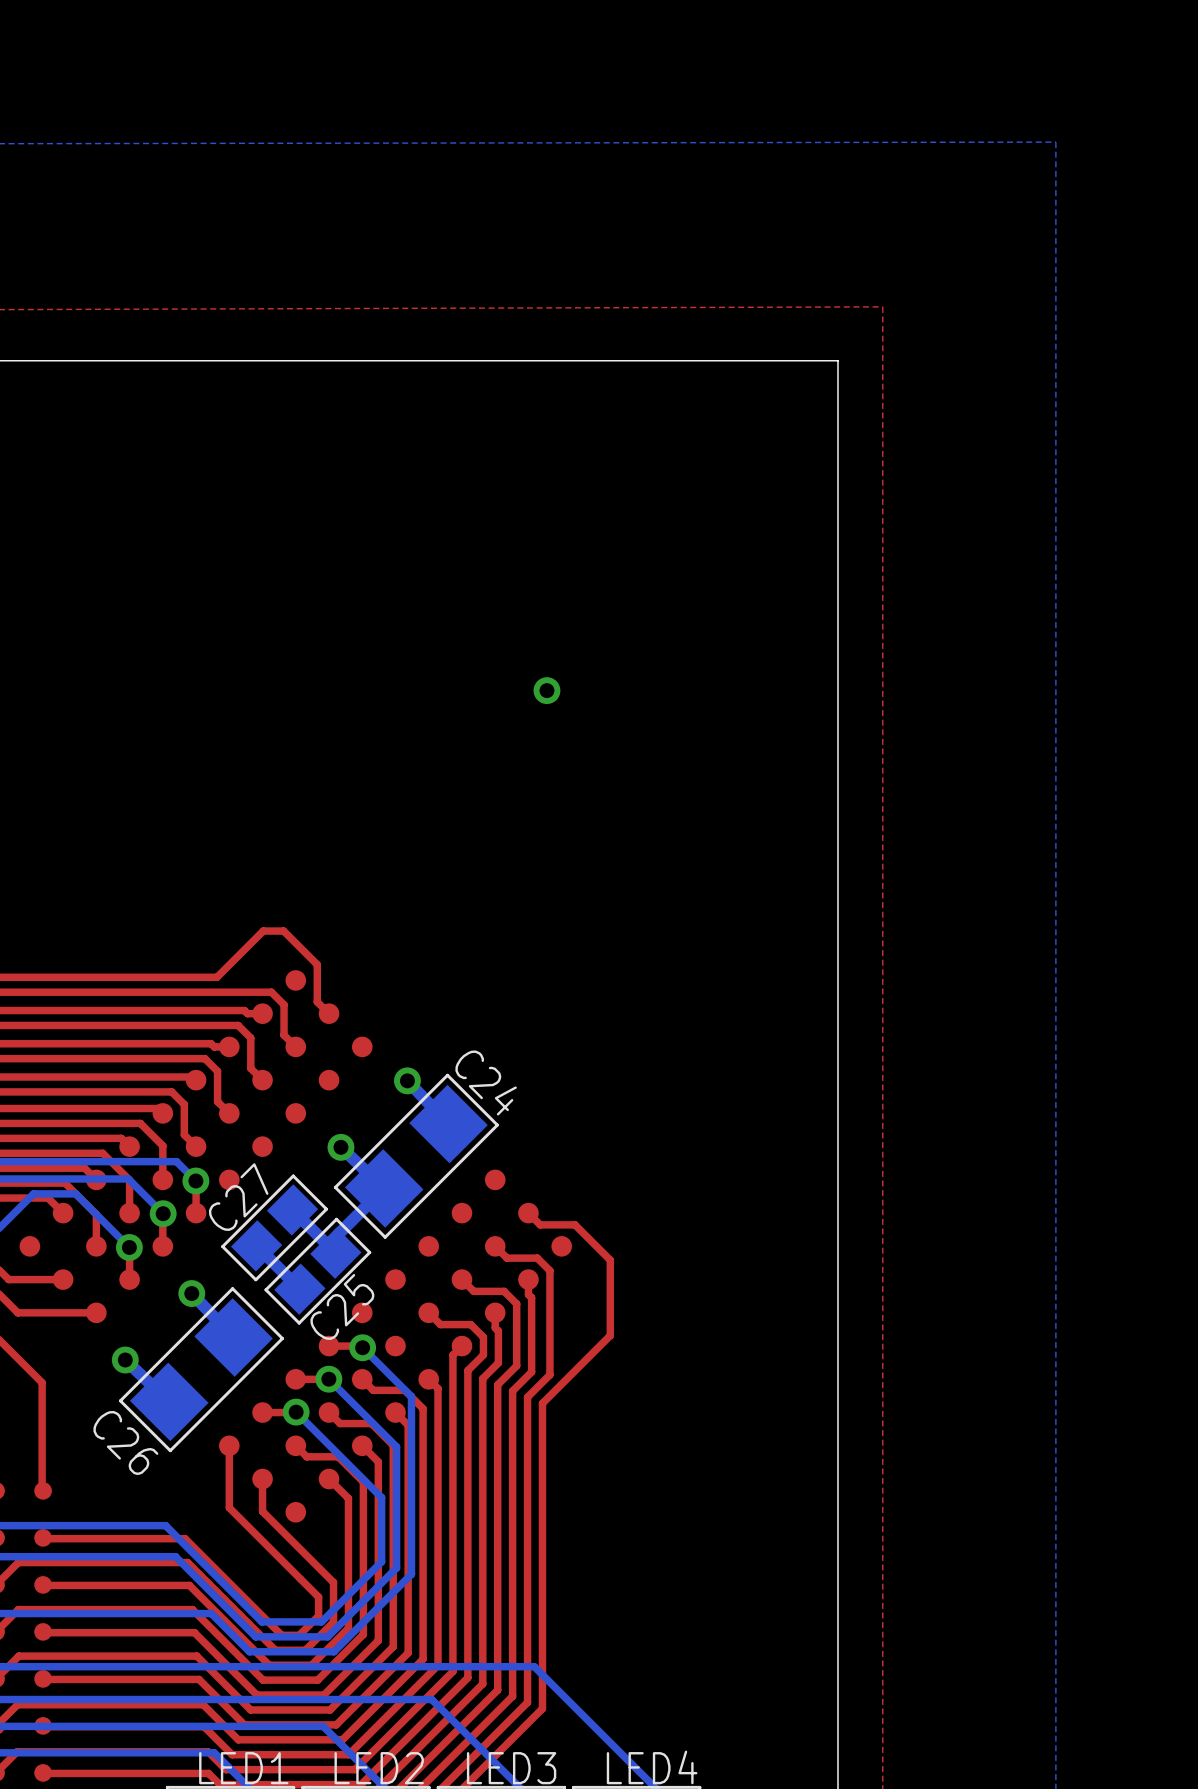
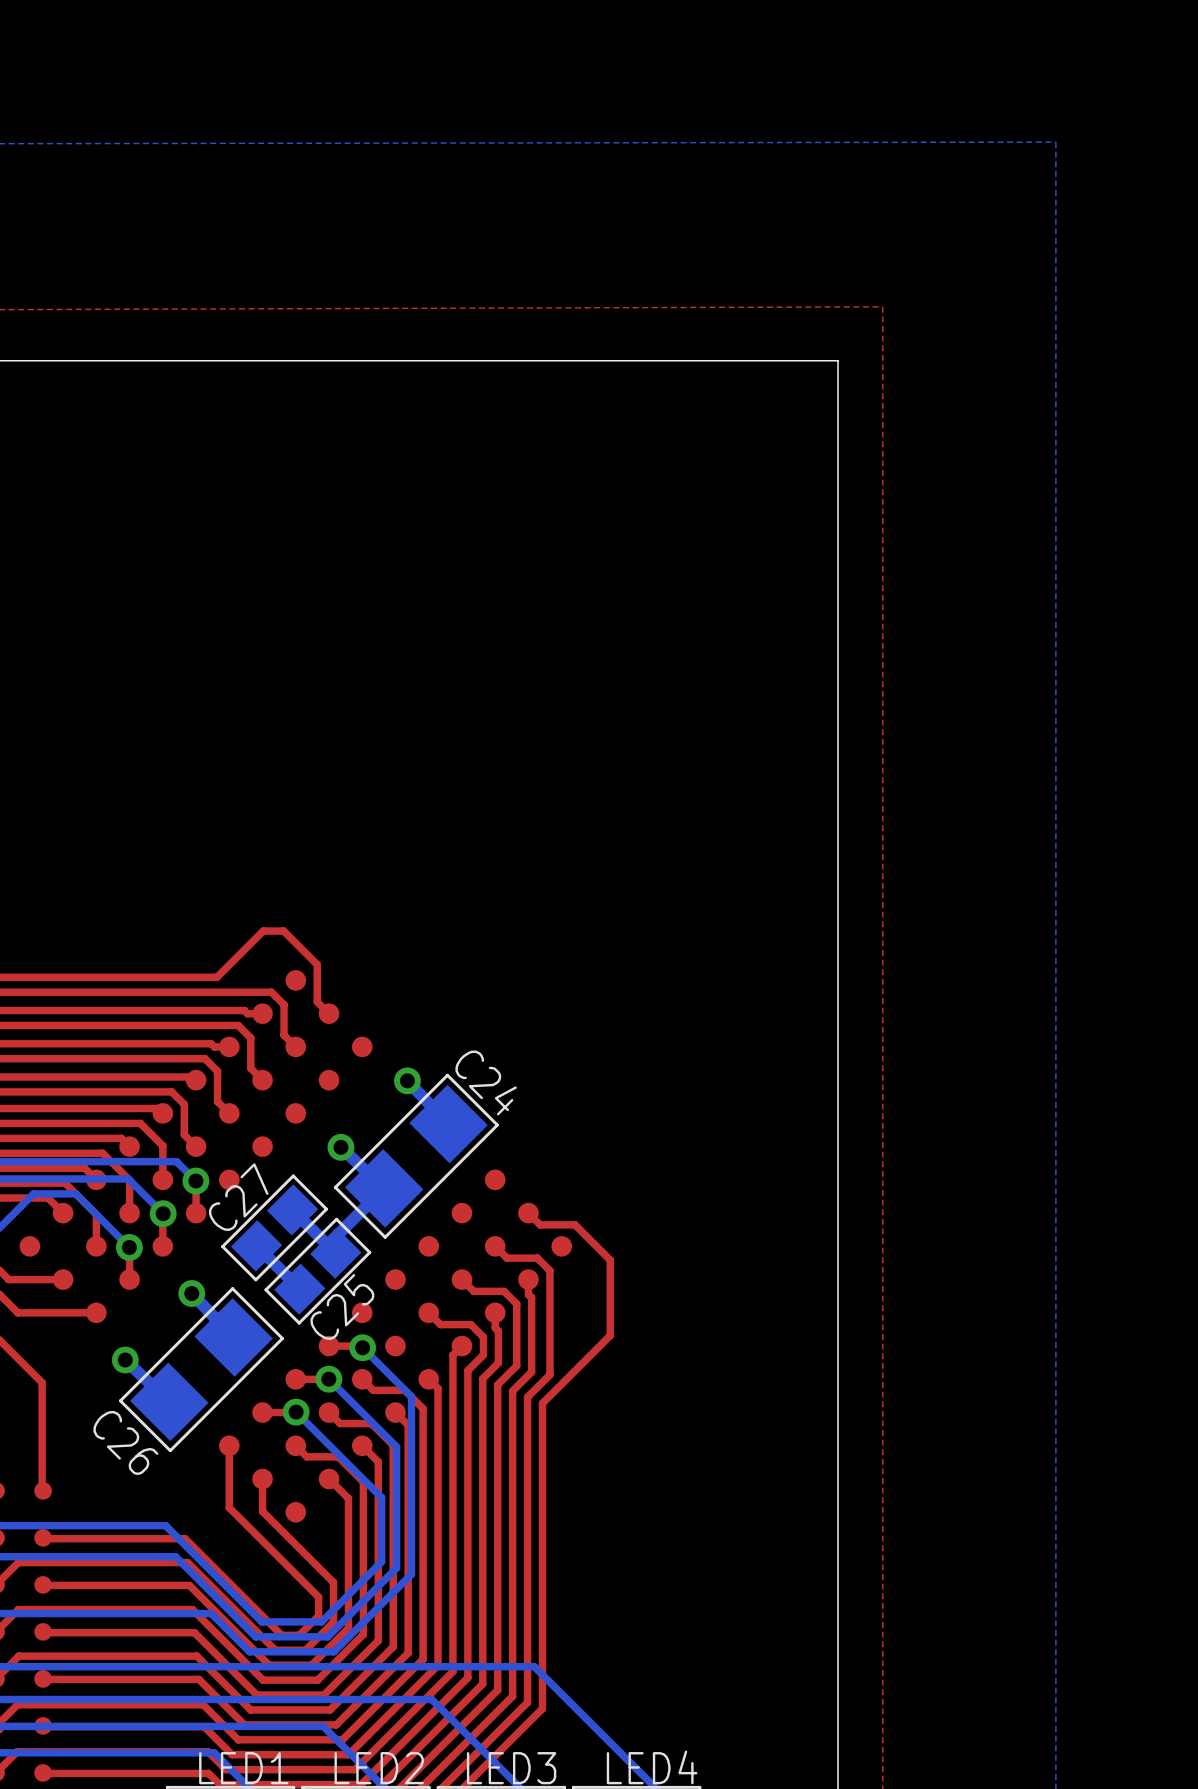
via: (546, 690) -> none

